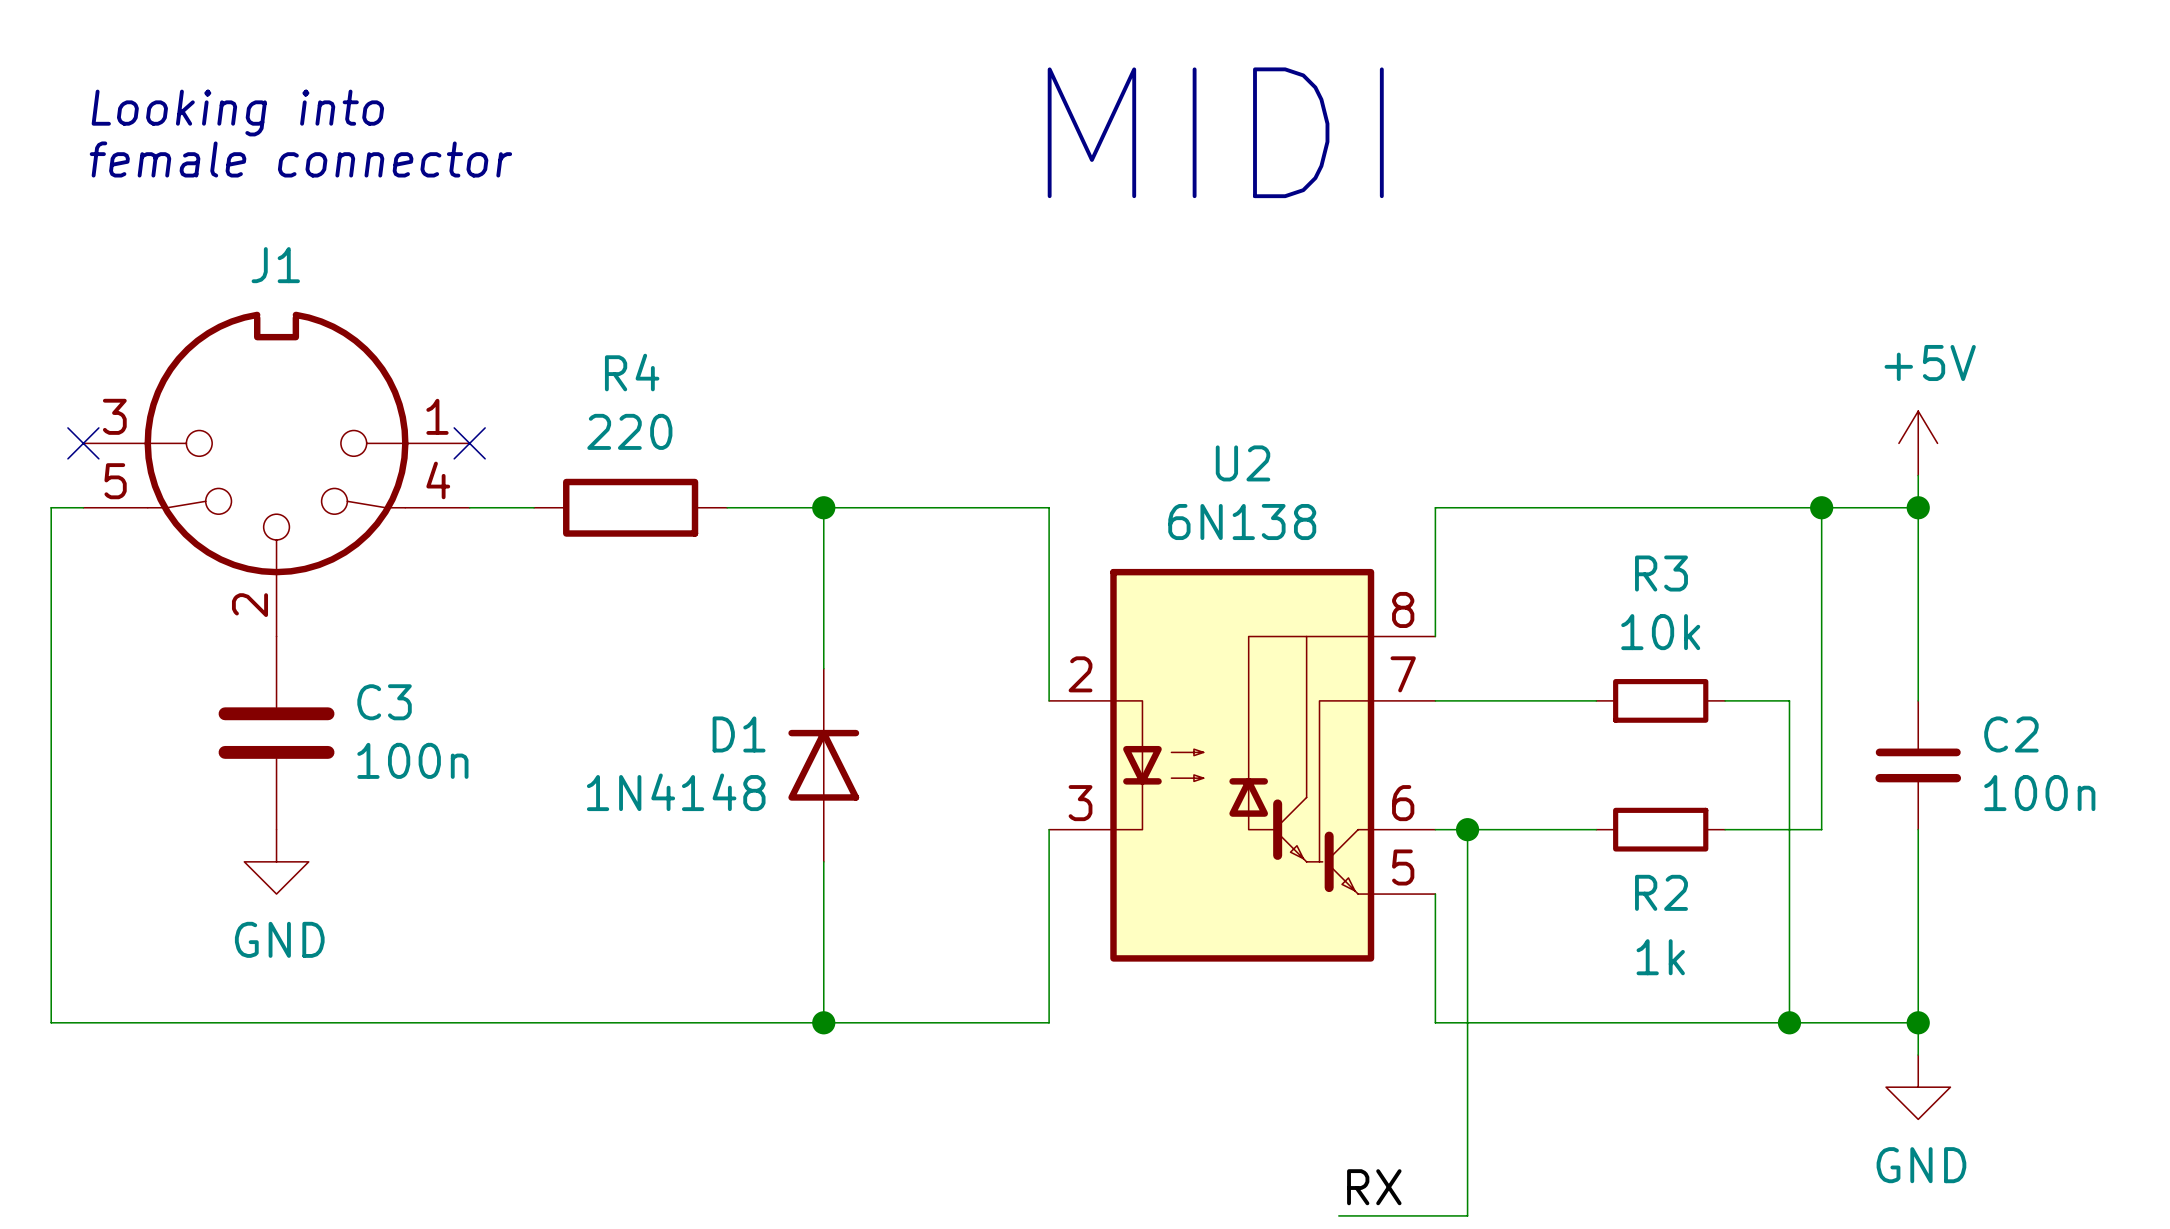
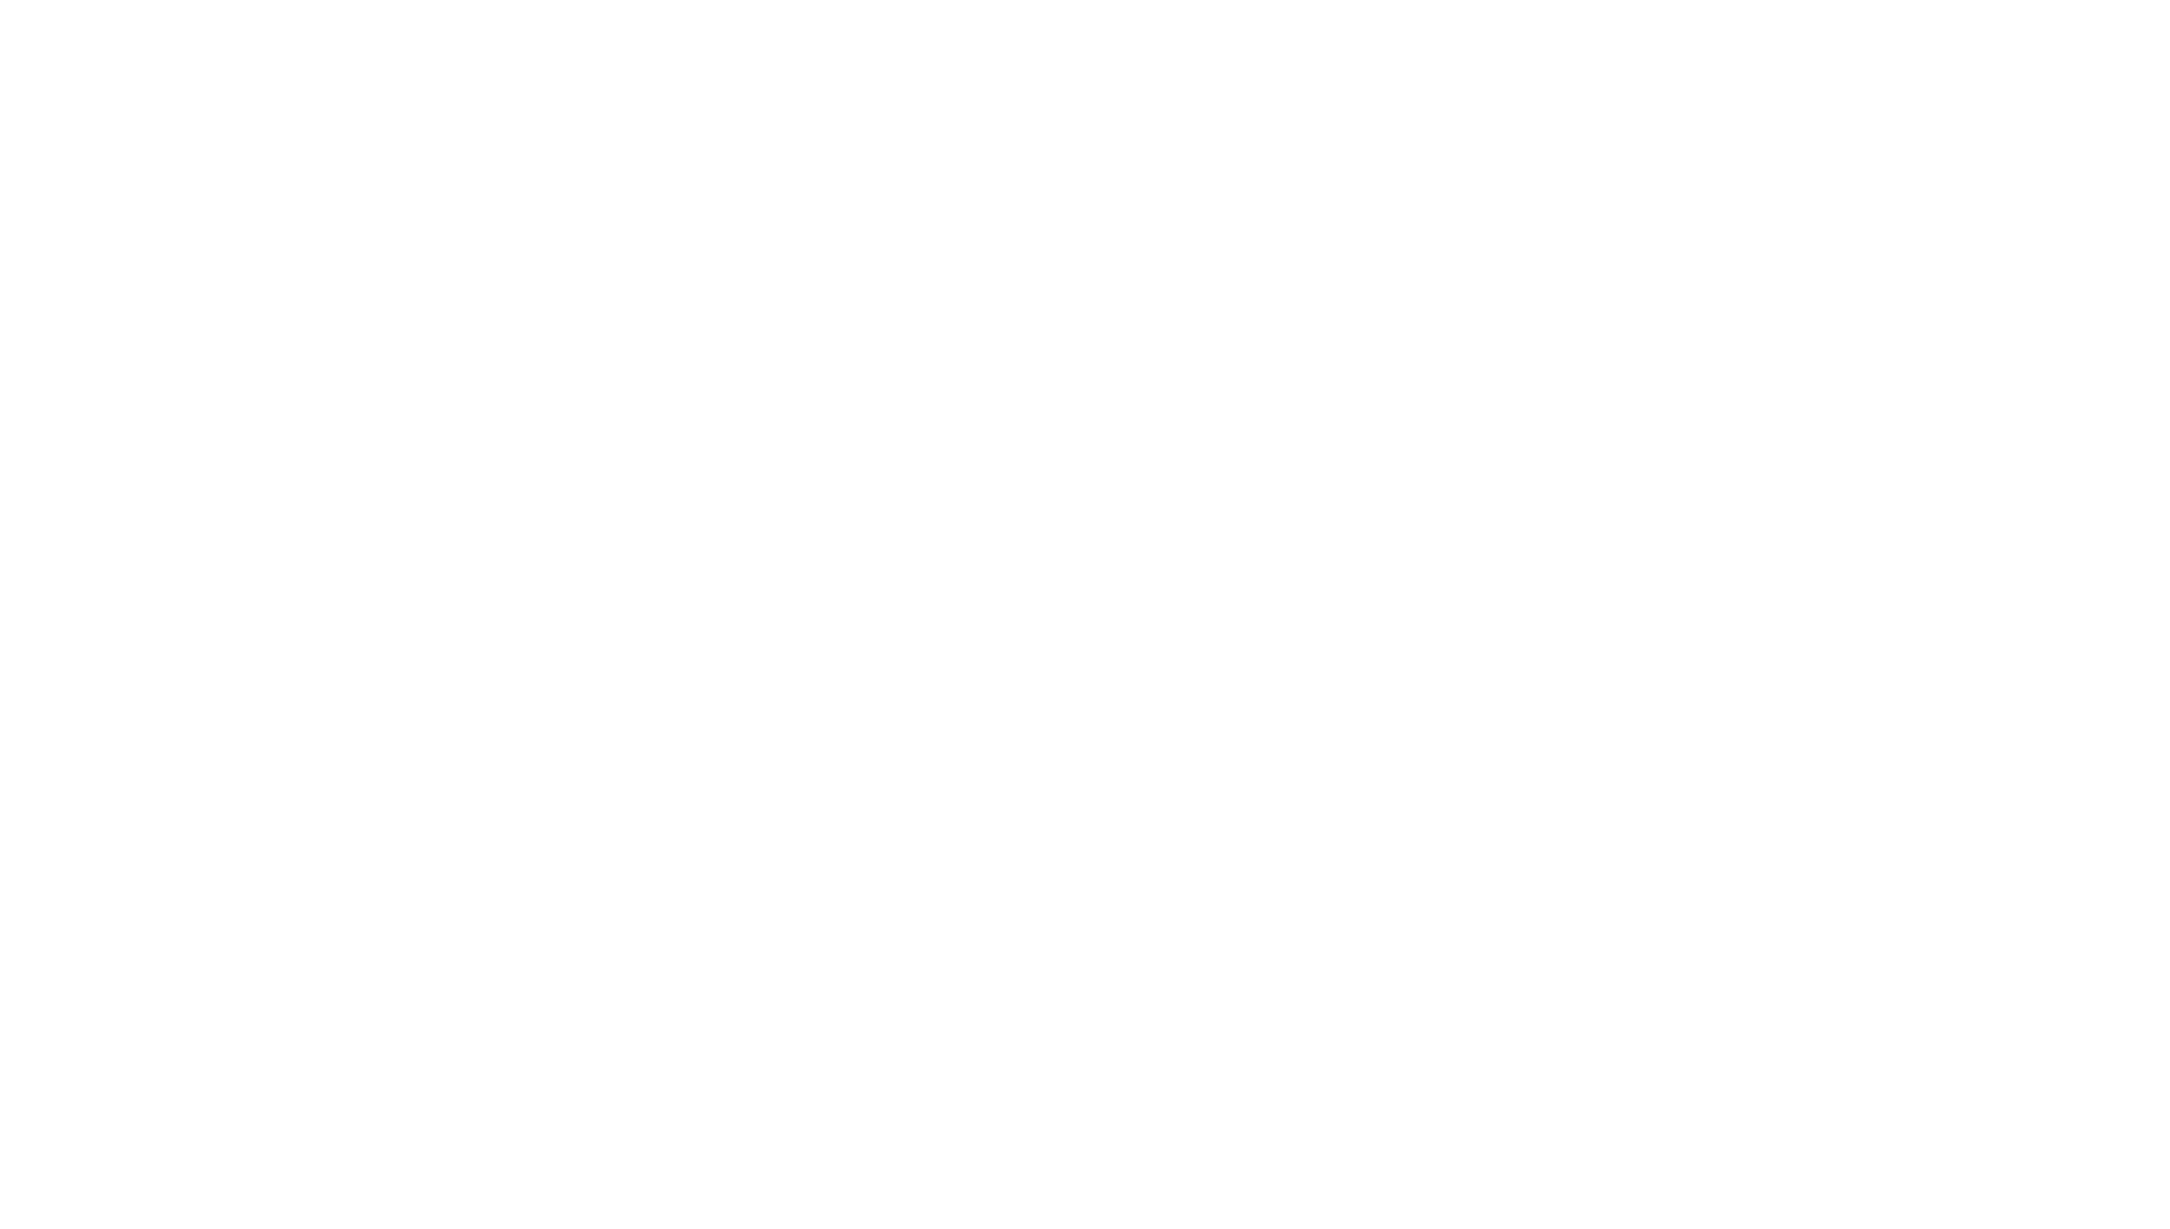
text: Looking into (237, 113) -> none
text: MIDI (1215, 132) -> none
text: female connector (300, 159) -> none
no-connect mark: (83, 443) -> none
no-connect mark: (469, 443) -> none
power symbol: +5V (1918, 443) -> none
J1: (276, 474) -> none
wire: (1918, 475) (1918, 700) -> none
wire: (83, 507) (51, 507) (51, 1022) (1049, 1022) (1049, 829) -> none
wire: (469, 507) (534, 507) -> none
R4: 220 (630, 507) -> none
wire: (727, 507) (1049, 507) (1049, 700) -> none
wire: (823, 507) (823, 668) -> none
junction: (823, 507) -> none
wire: (1821, 507) (1821, 829) (1725, 829) -> none
junction: (1821, 507) -> none
wire: (1918, 507) (1435, 507) (1435, 636) -> none
junction: (1918, 507) -> none
wire: (1435, 700) (1596, 700) -> none
R3: 10k (1660, 700) -> none
wire: (1725, 700) (1789, 700) (1789, 1022) -> none
C3: 100n (276, 733) -> none
D1: 1N4148 (823, 765) -> none
U2: 6N138 (1242, 765) -> none
C2: 100n (1918, 765) -> none
wire: (1435, 829) (1596, 829) -> none
wire: (1467, 829) (1467, 1215) (1338, 1215) -> none
junction: (1467, 829) -> none
R2: 1k (1660, 829) -> none
wire: (1918, 829) (1918, 1054) -> none
power symbol: GND (276, 861) -> none
wire: (823, 861) (823, 1022) -> none
wire: (1435, 894) (1435, 1022) (1918, 1022) -> none
junction: (823, 1022) -> none
junction: (1789, 1022) -> none
junction: (1918, 1022) -> none
power symbol: GND (1918, 1087) -> none
label: RX (1374, 1187) -> none

